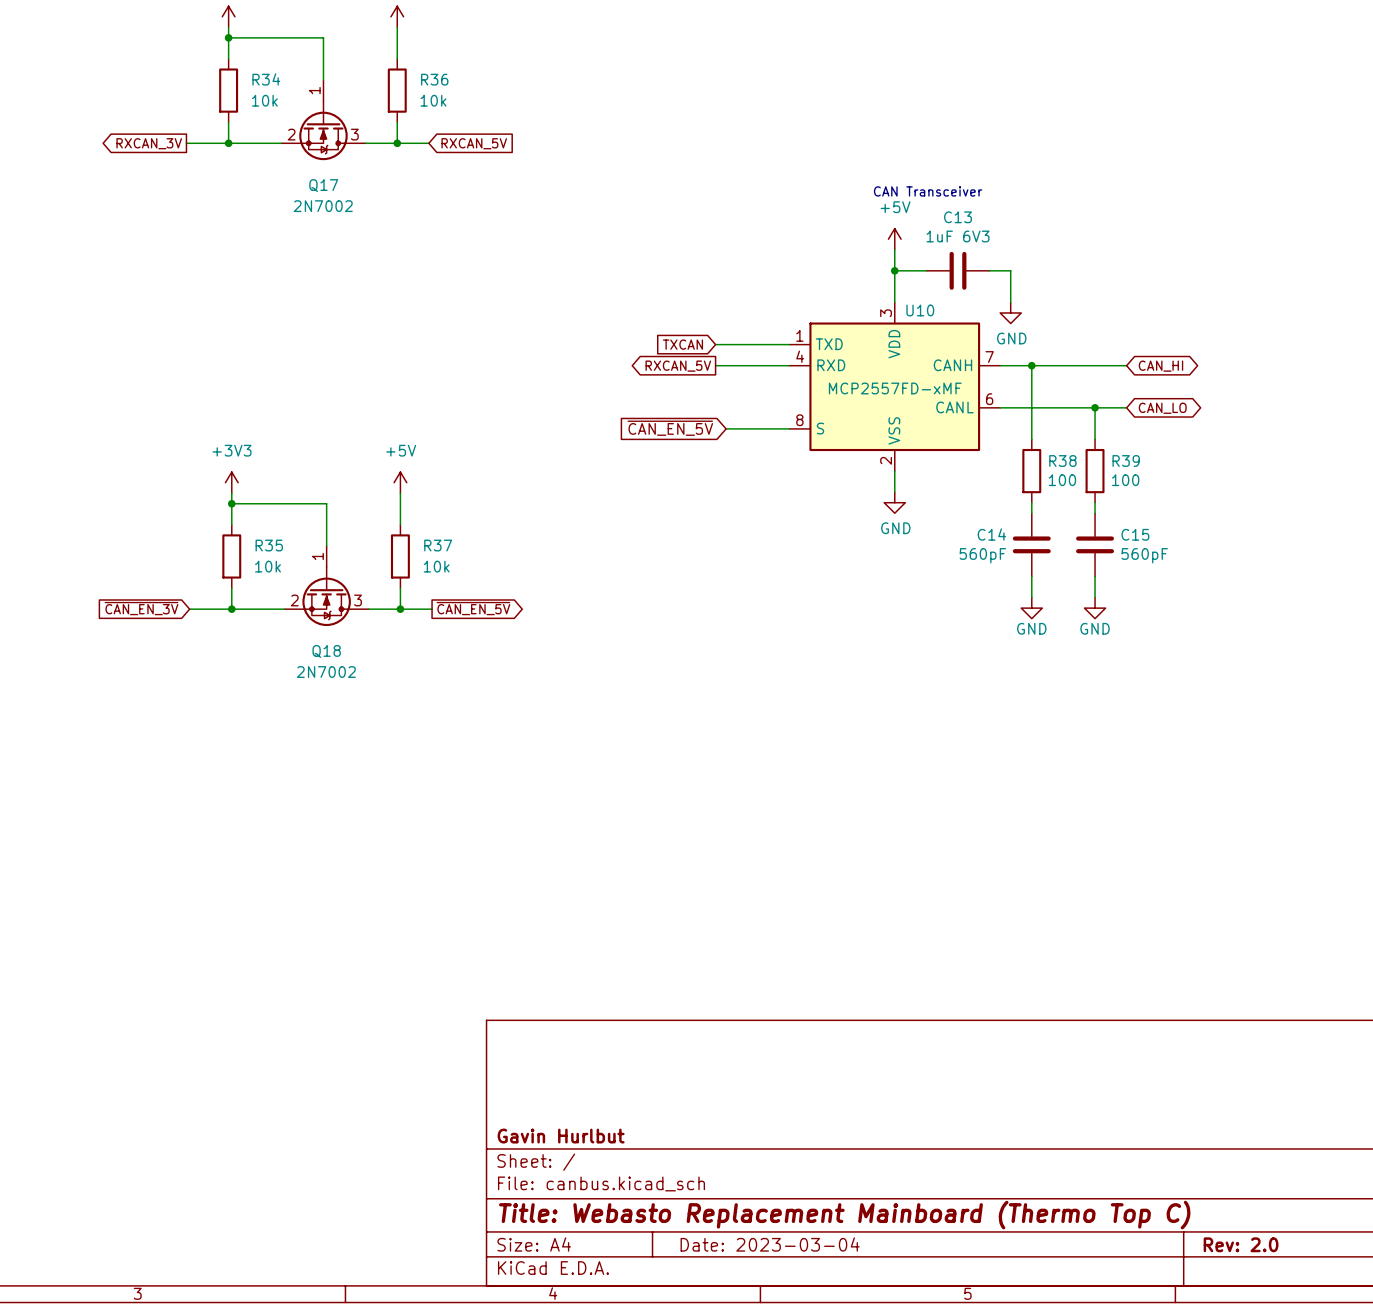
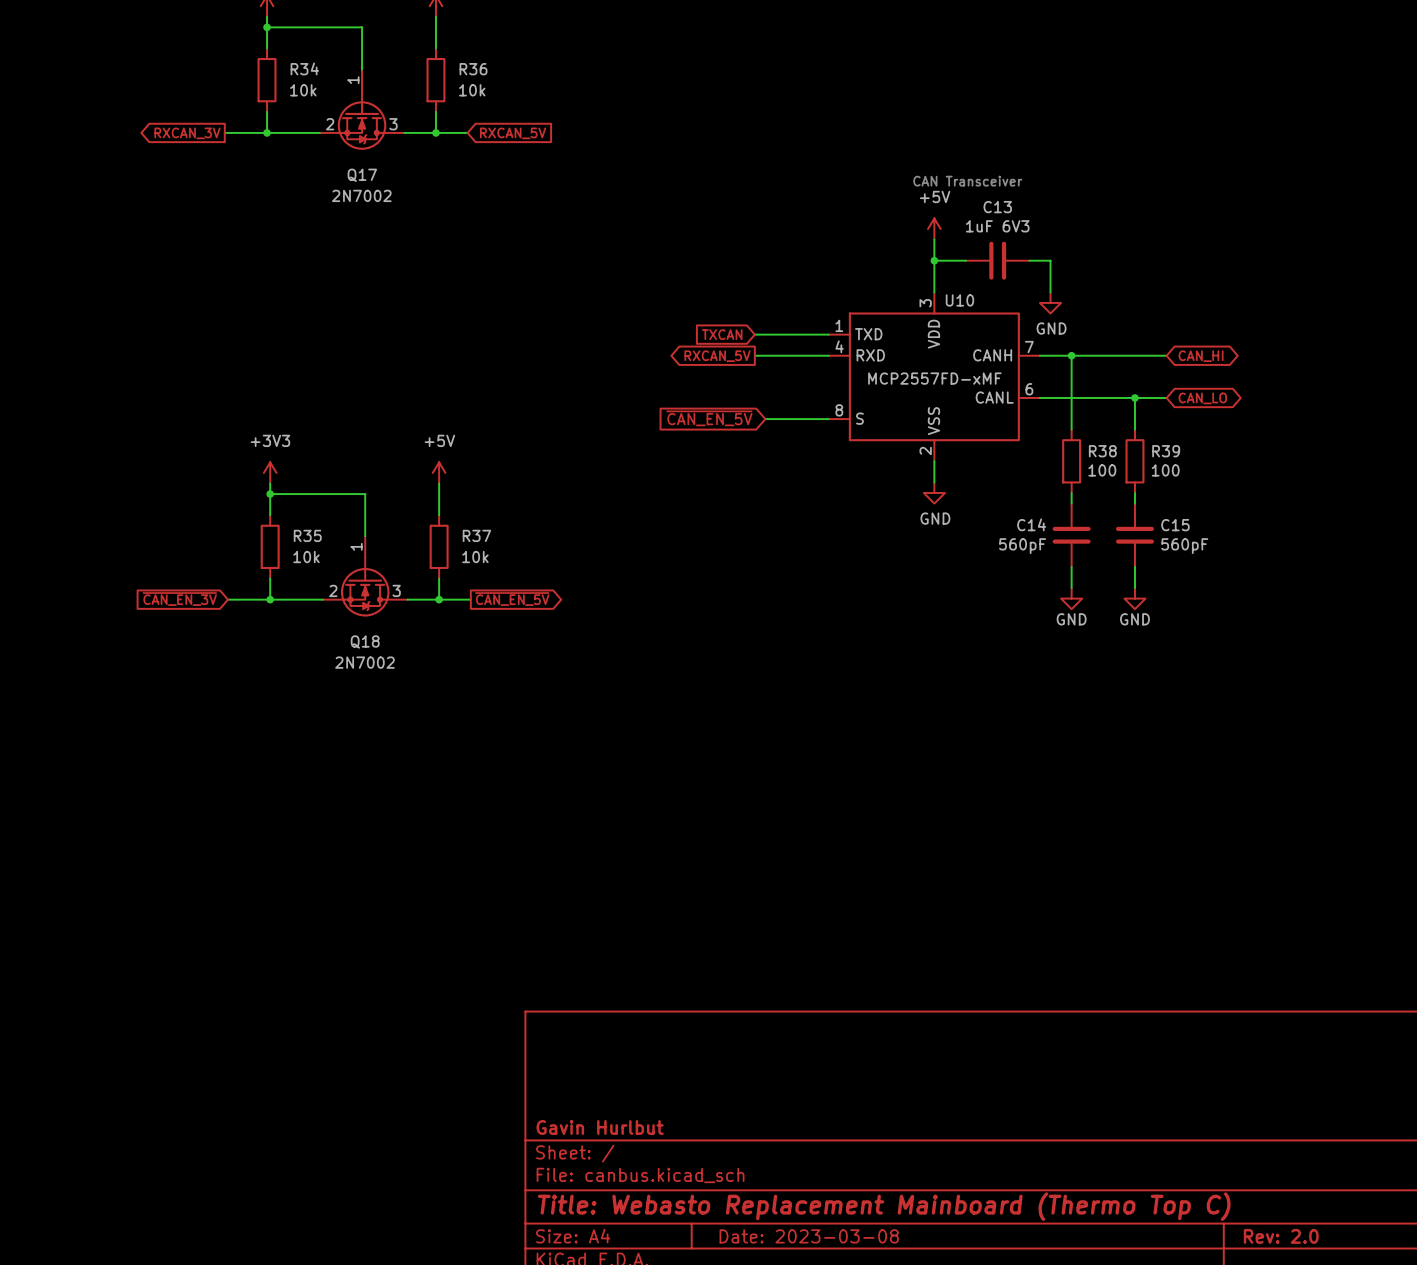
title block: Date: 2023-03-04 (770, 1244) -> Date: 2023-03-08 (809, 1236)

